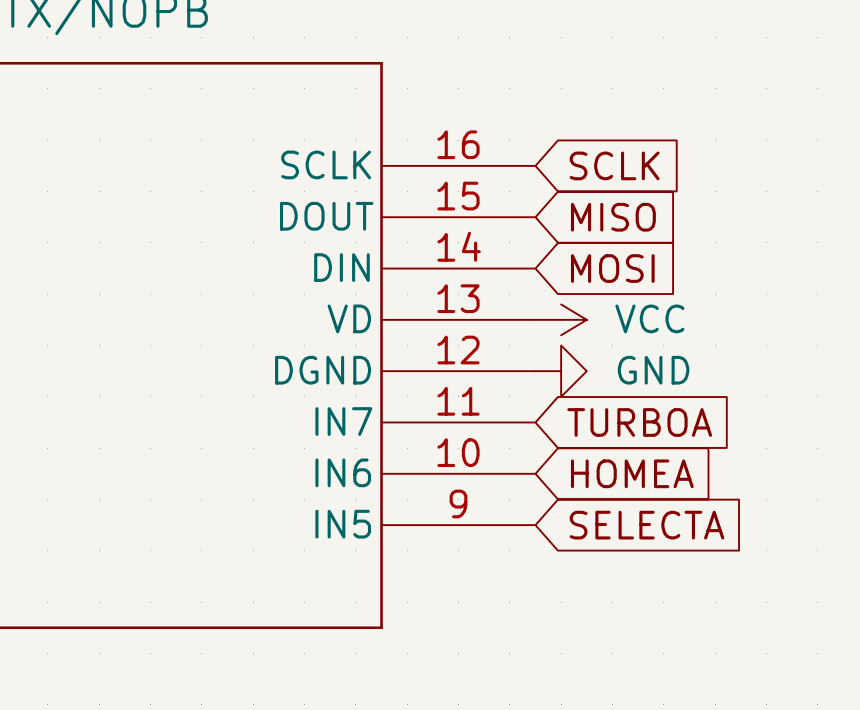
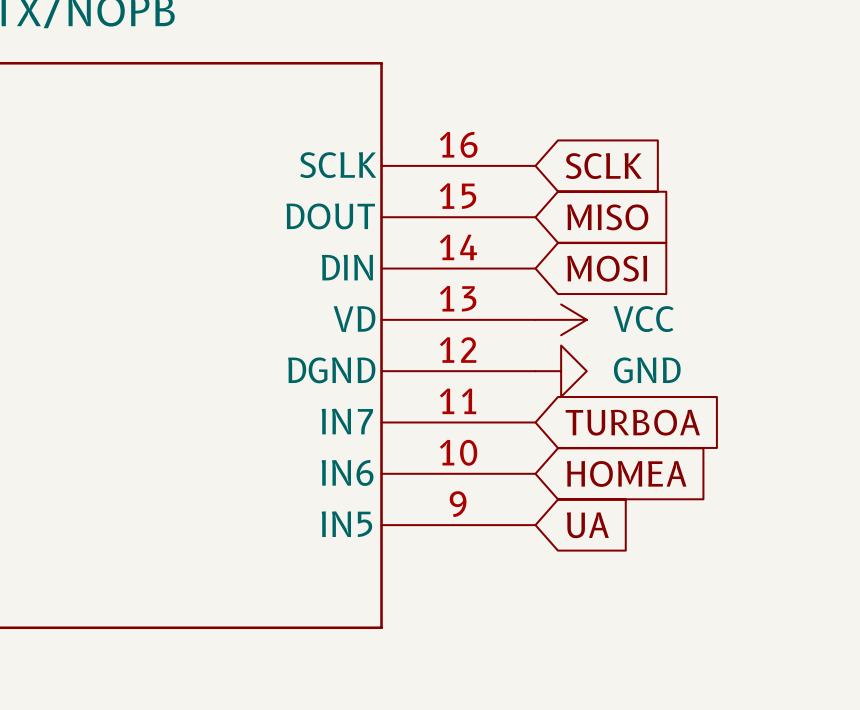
global label: SELECTA (647, 525) -> UA (587, 525)

